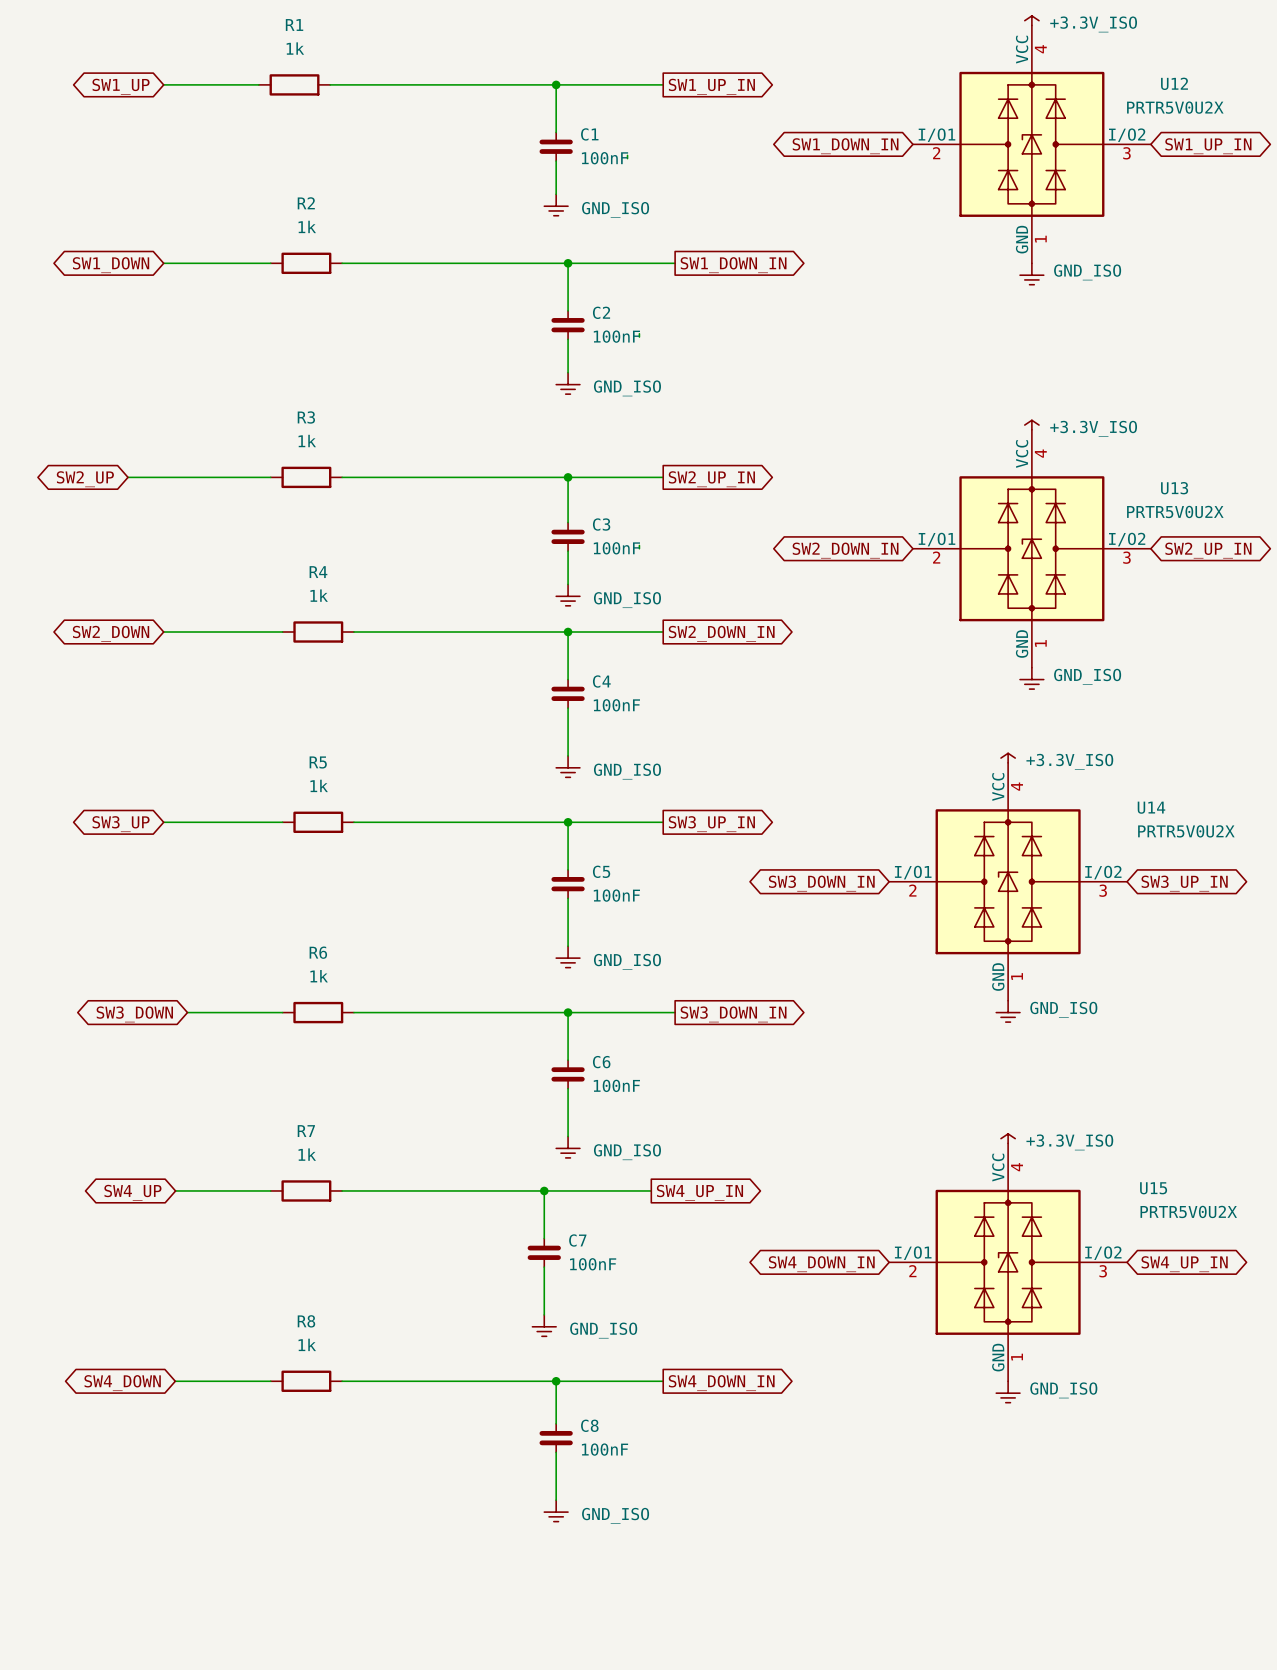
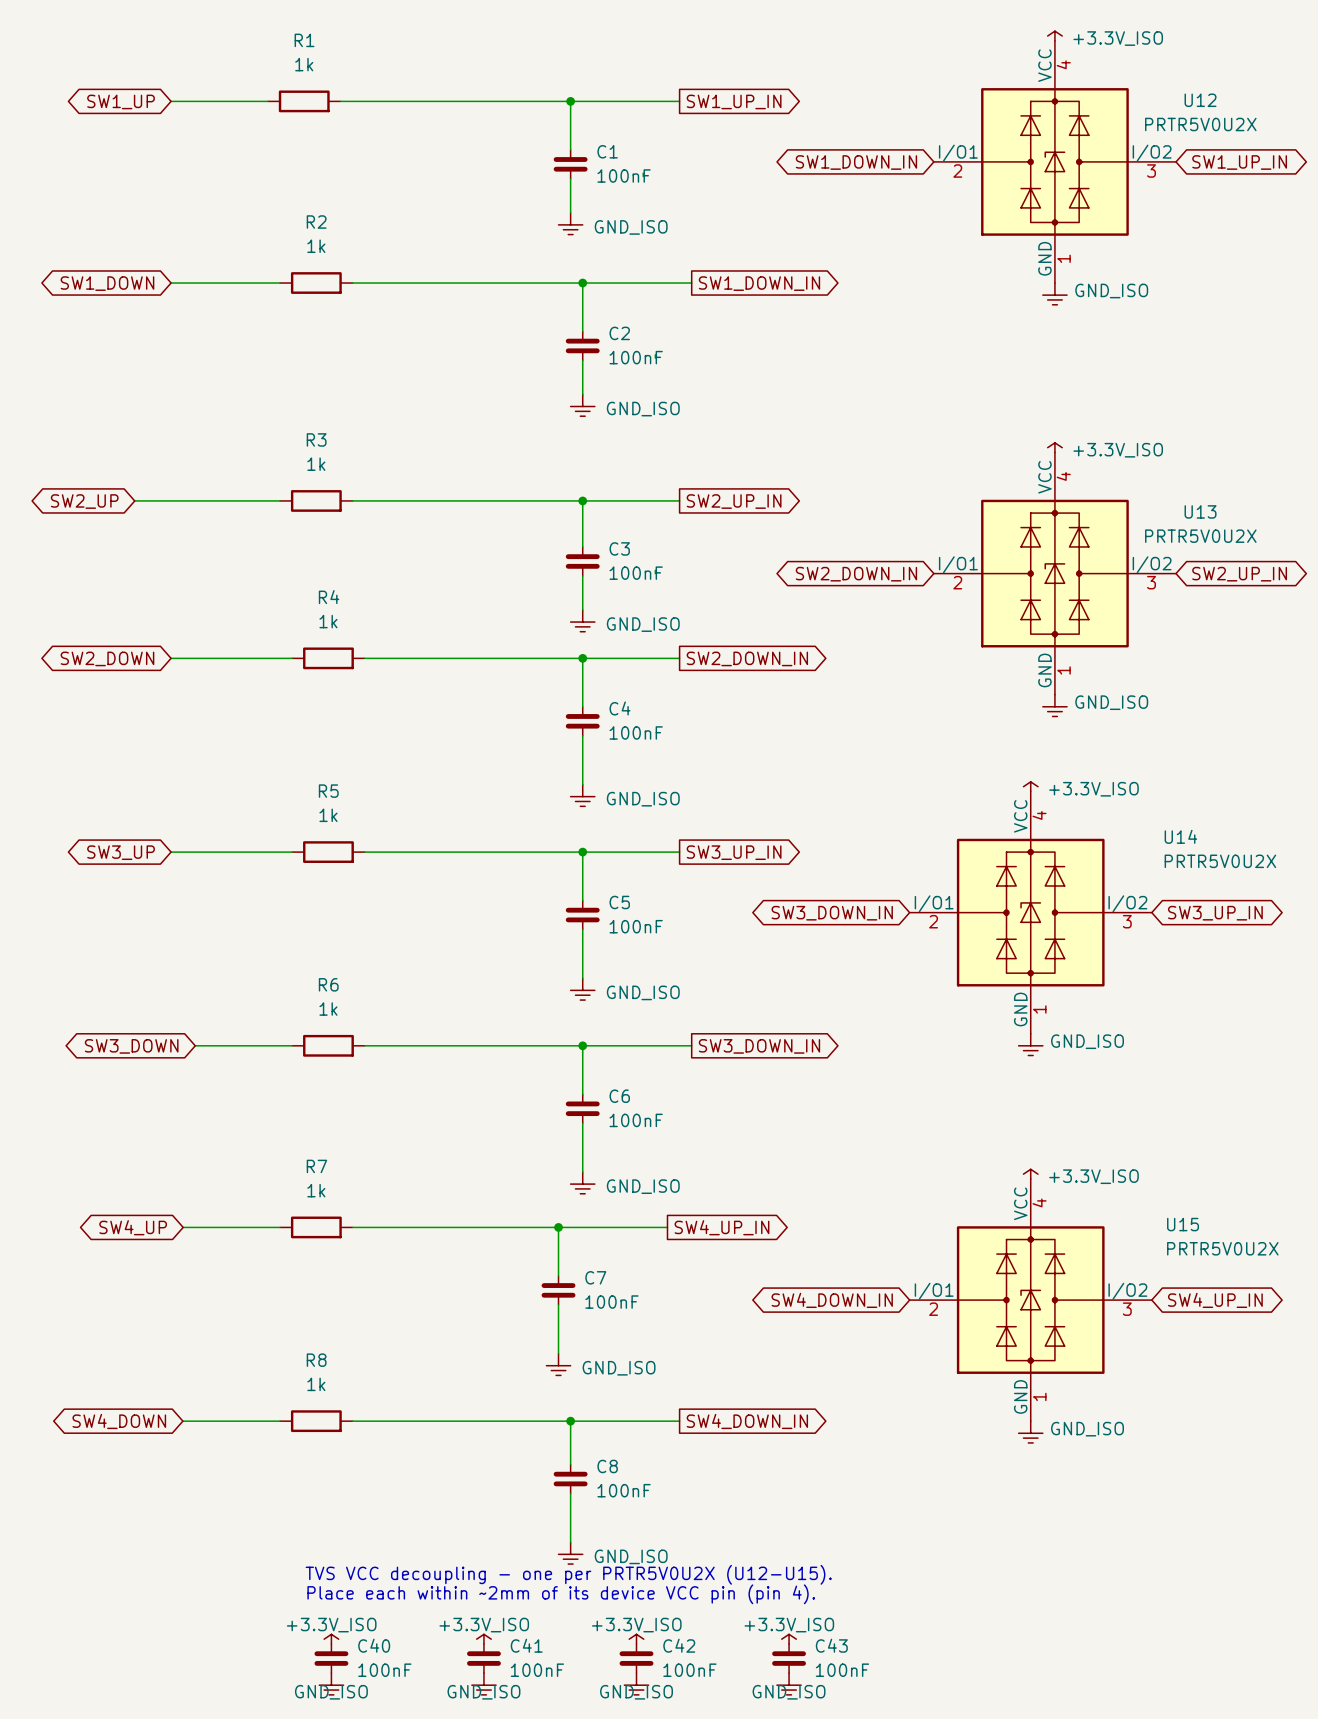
text: none -> TVS VCC decoupling - one per PRTR5V0U2X (U12-U15). (568, 1574)
text: none -> Place each within ~2mm of its device VCC pin (pin 4). (561, 1594)
power symbol: none -> +3.3V_ISO (331, 1639)
power symbol: none -> +3.3V_ISO (483, 1639)
power symbol: none -> +3.3V_ISO (636, 1639)
power symbol: none -> +3.3V_ISO (789, 1639)
C40: none -> 100nF (331, 1658)
C41: none -> 100nF (483, 1658)
C42: none -> 100nF (636, 1658)
C43: none -> 100nF (789, 1658)
power symbol: none -> GND_ISO (331, 1683)
power symbol: none -> GND_ISO (483, 1683)
power symbol: none -> GND_ISO (636, 1683)
power symbol: none -> GND_ISO (789, 1683)

